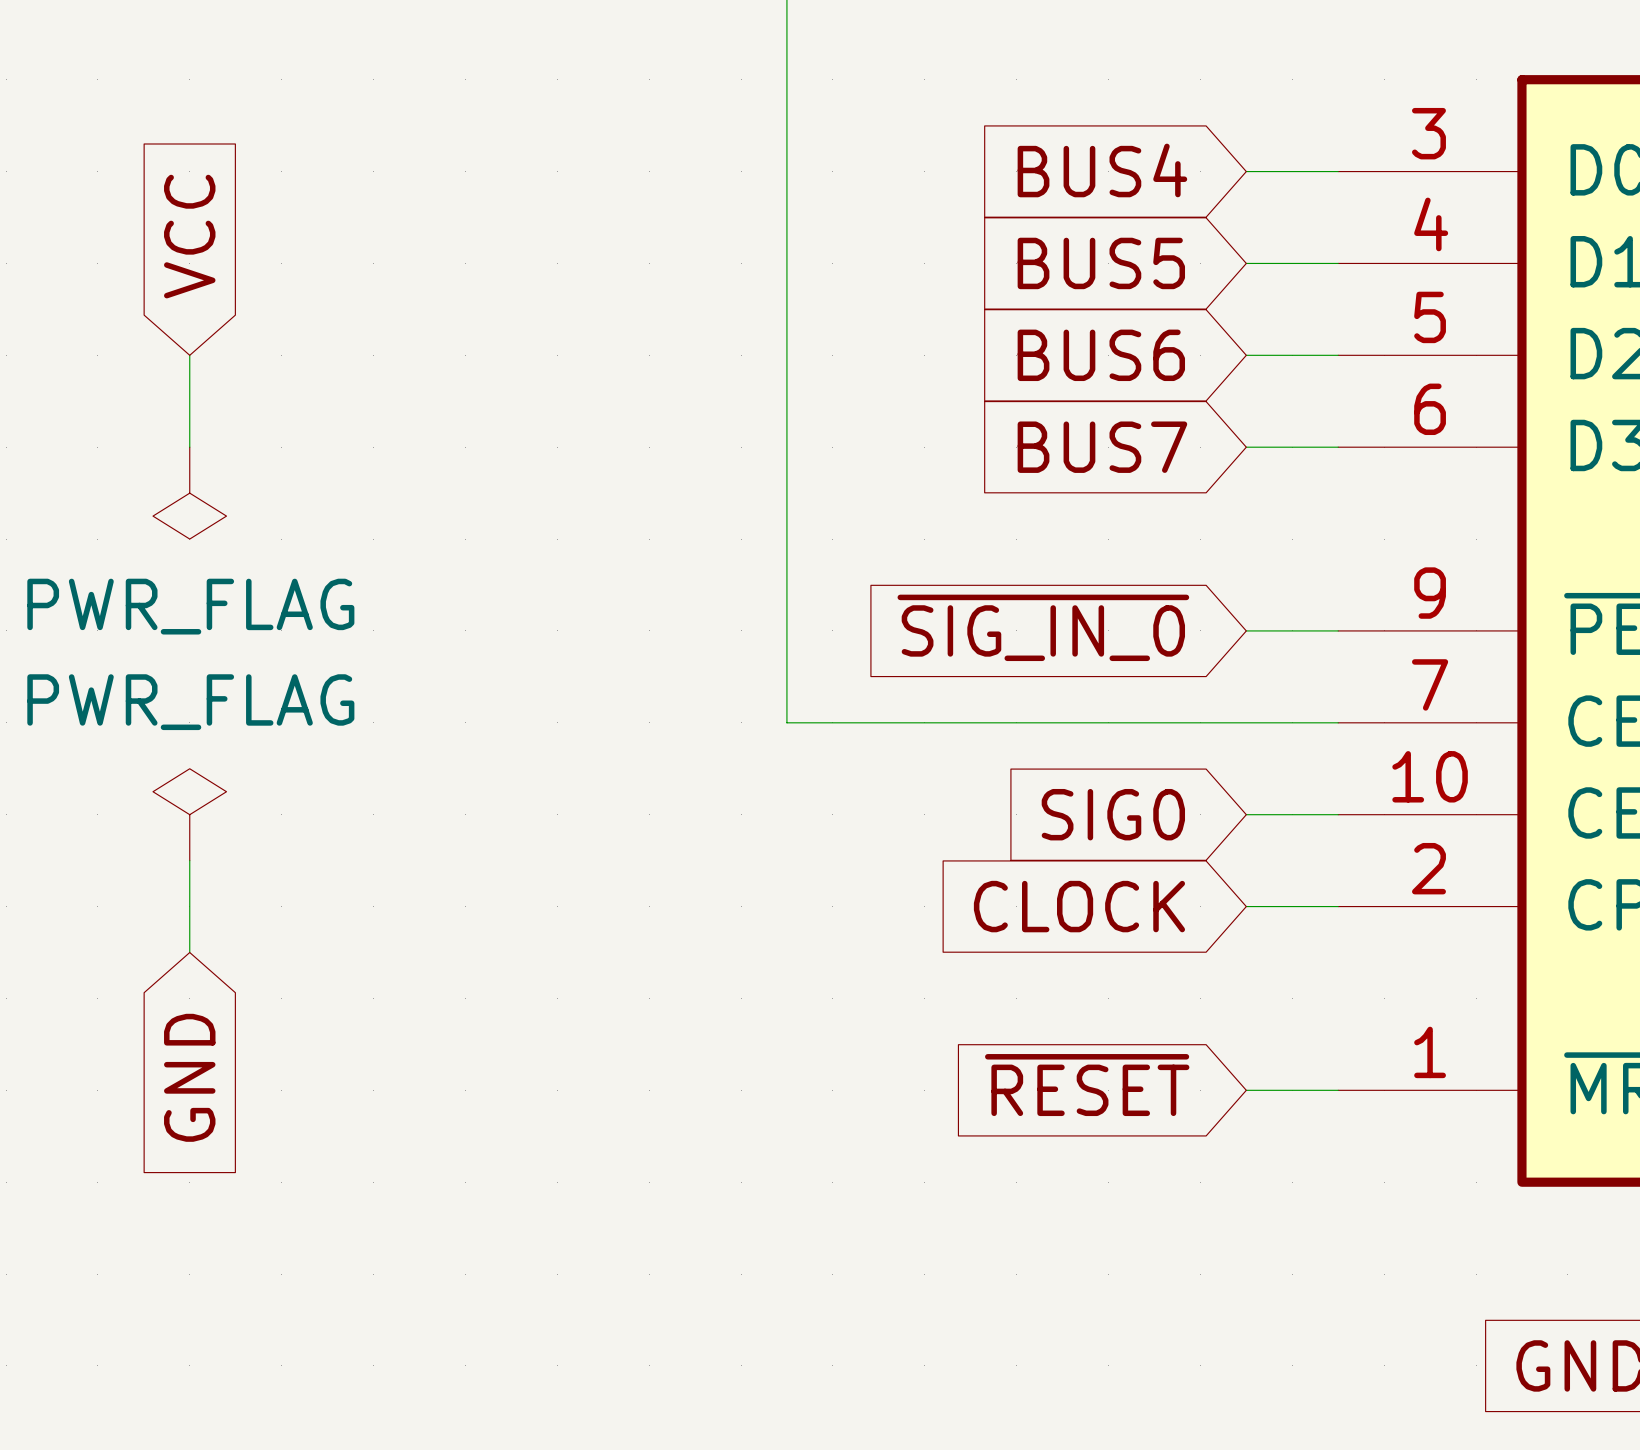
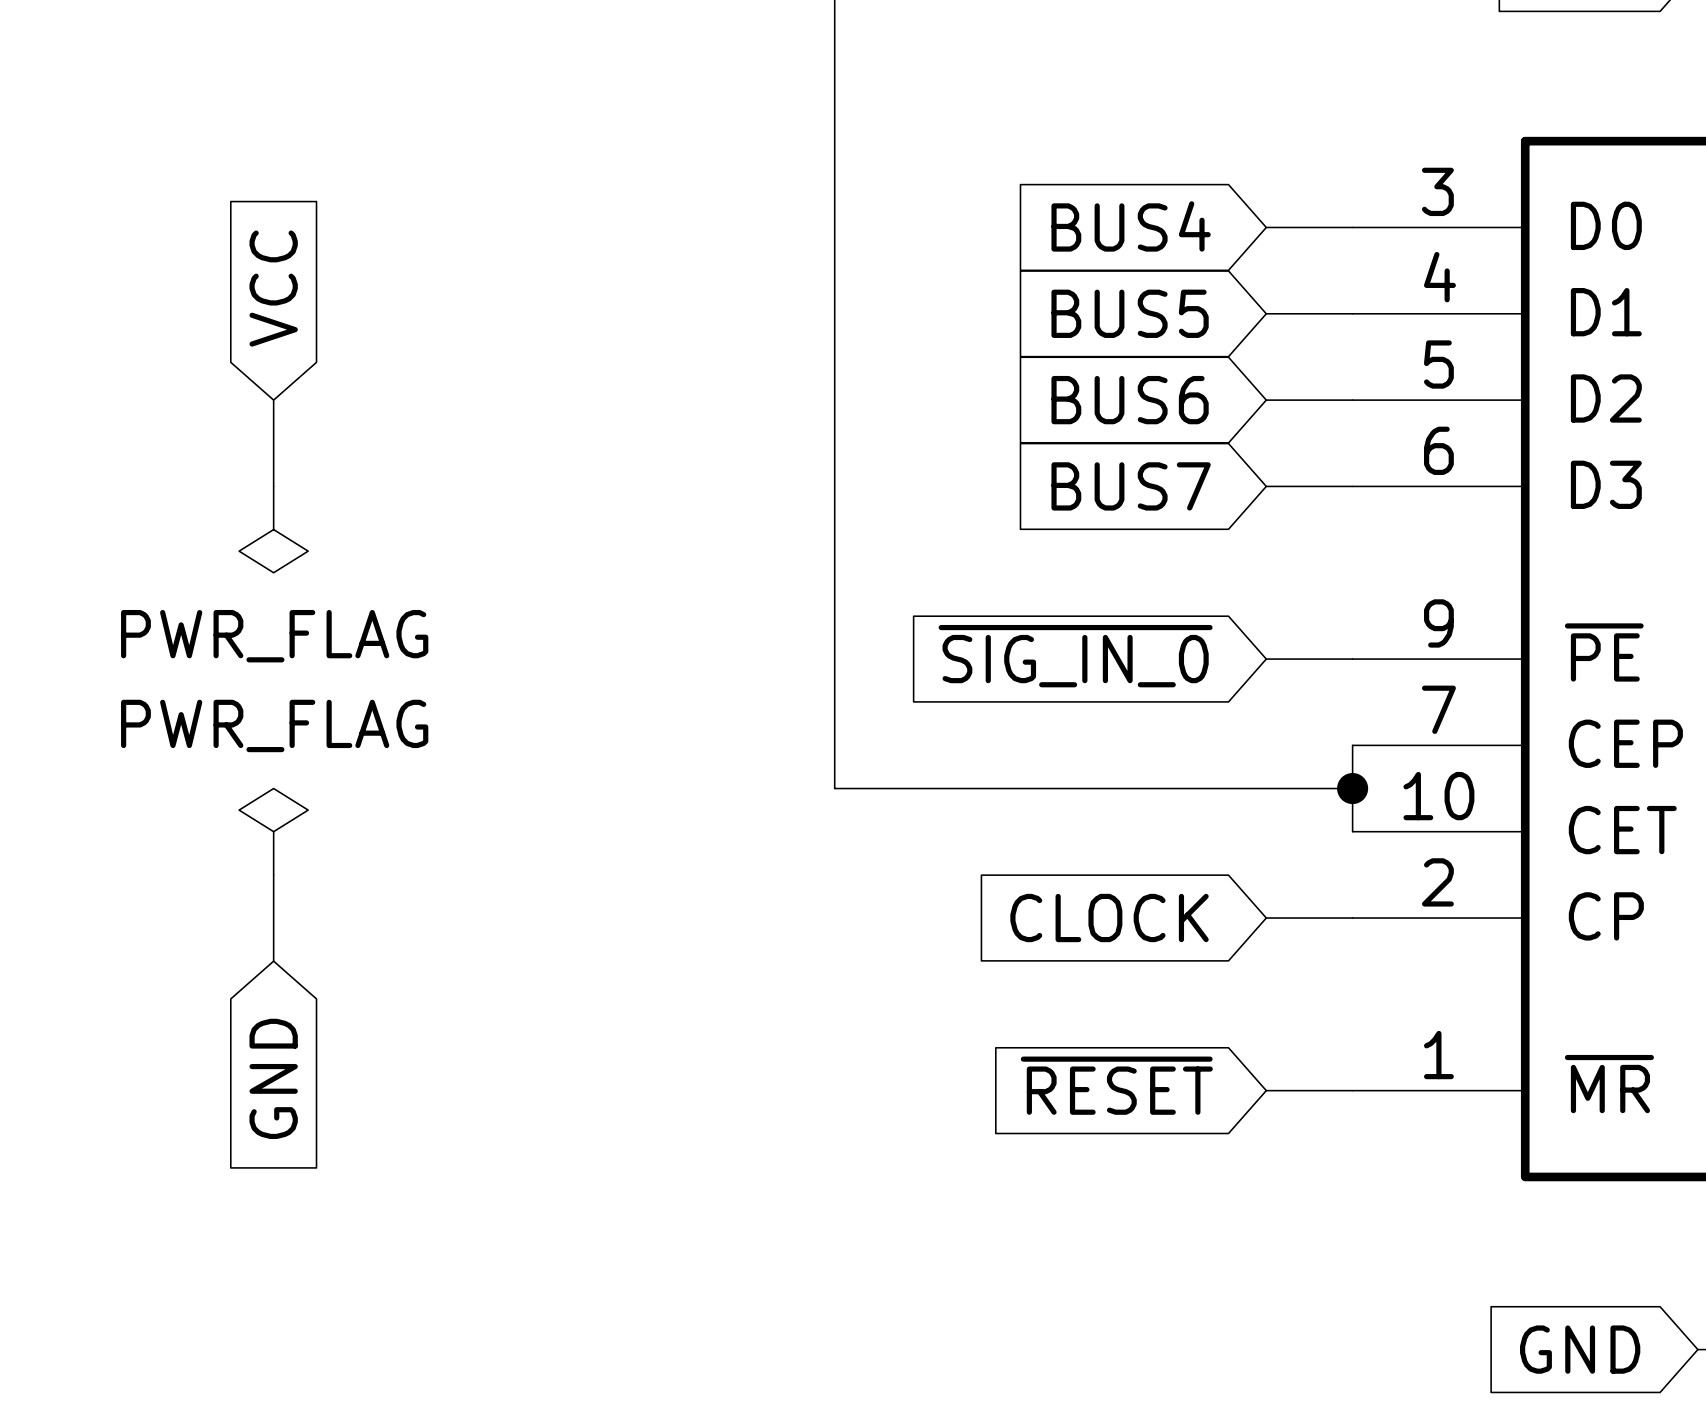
wire: (786, 722) (1338, 722) -> (834, 745) (834, 788) (1352, 788)
junction: none -> (1352, 788)
global label: SIG0 (1113, 814) -> none
wire: (1246, 814) (1338, 814) -> (1352, 745) (1352, 831)

